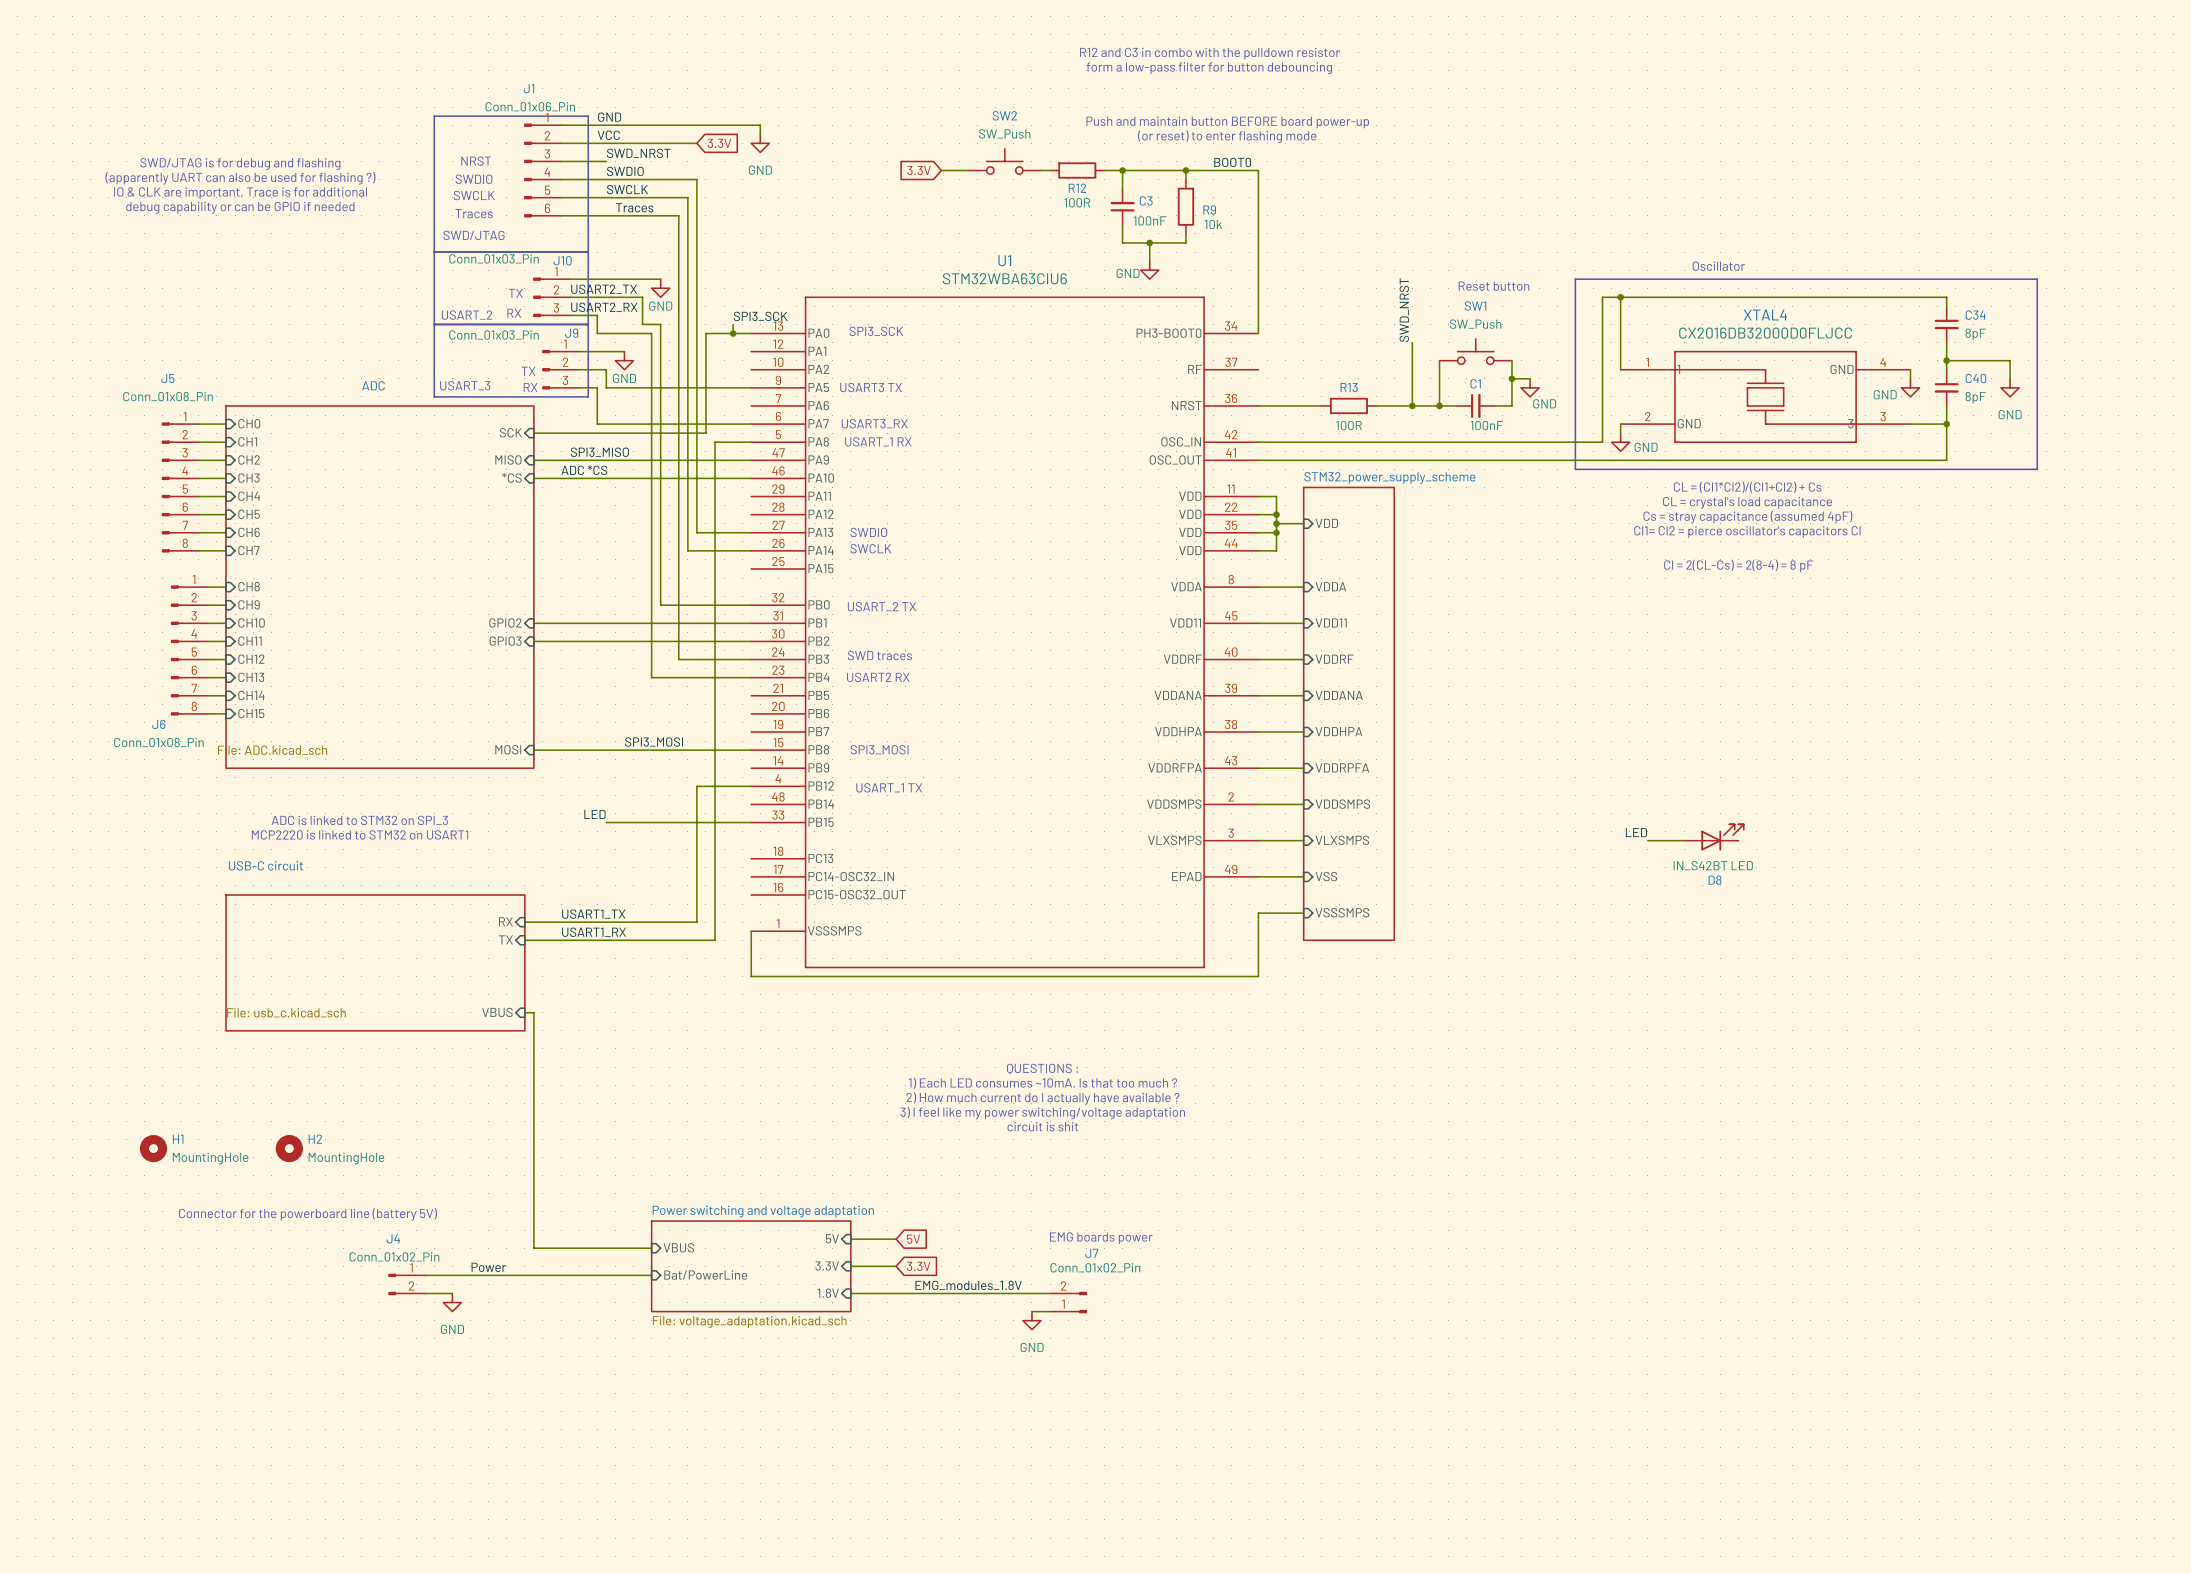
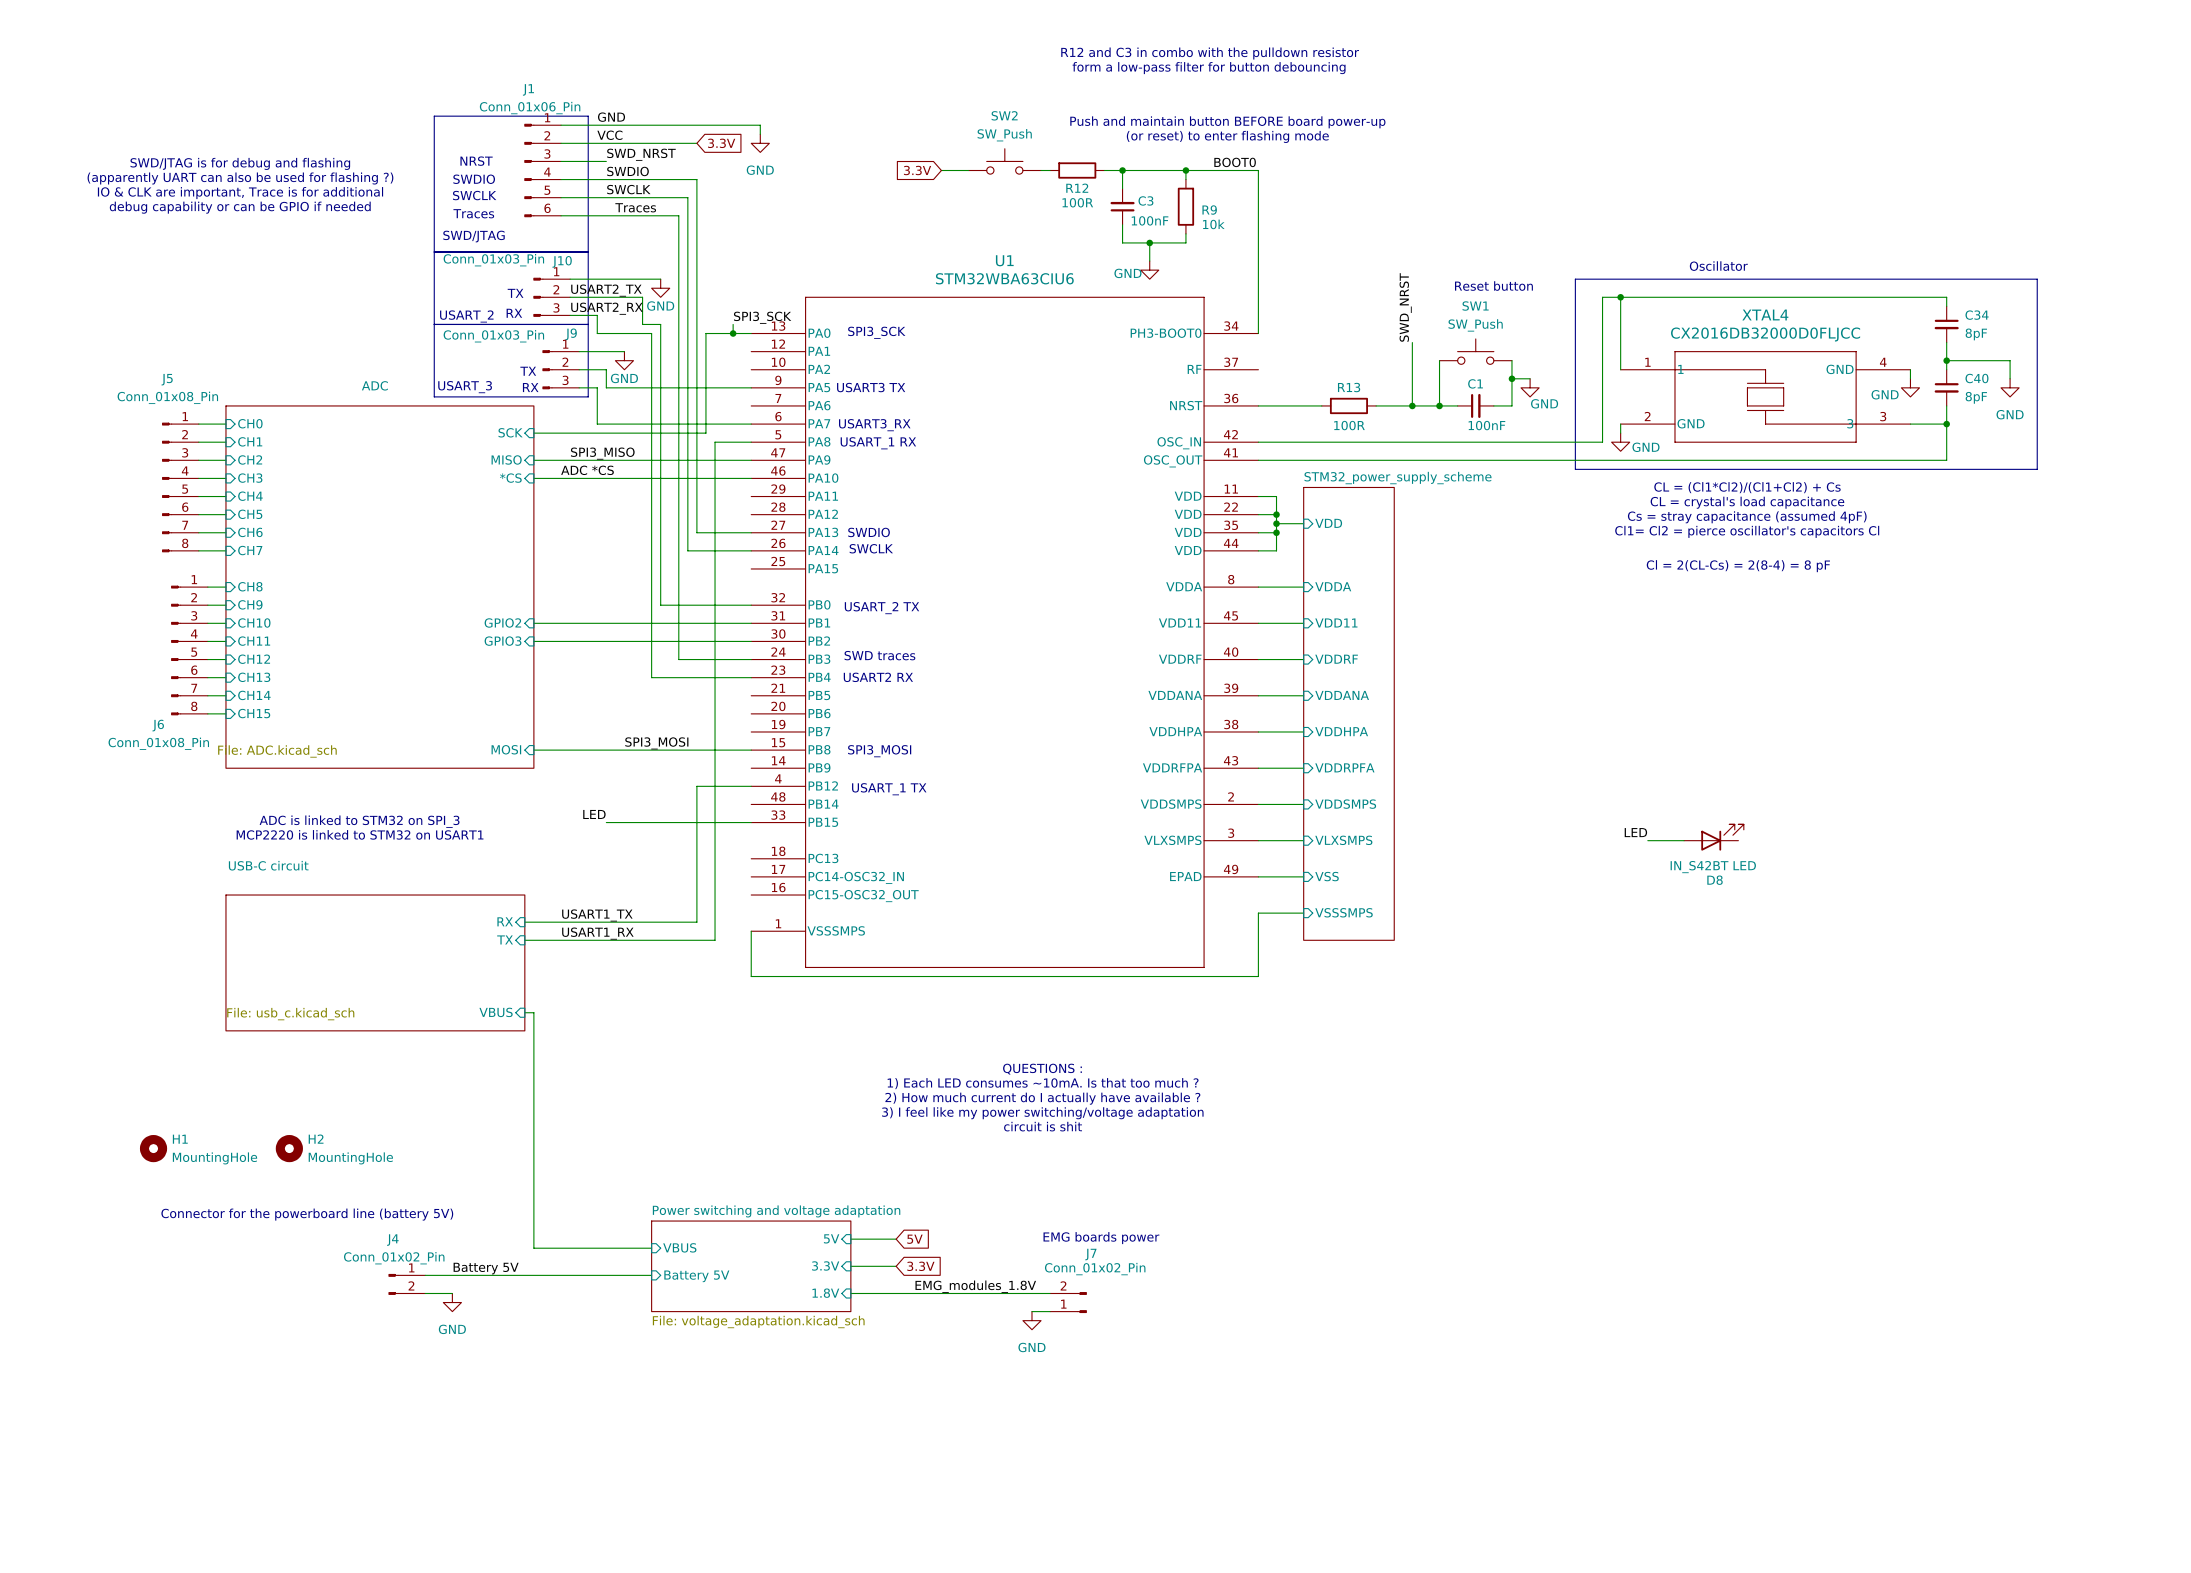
label: Power (488, 1267) -> none
label: none -> Battery 5V (486, 1268)
sheet pin: Bat/PowerLine (705, 1275) -> Battery 5V (696, 1276)

